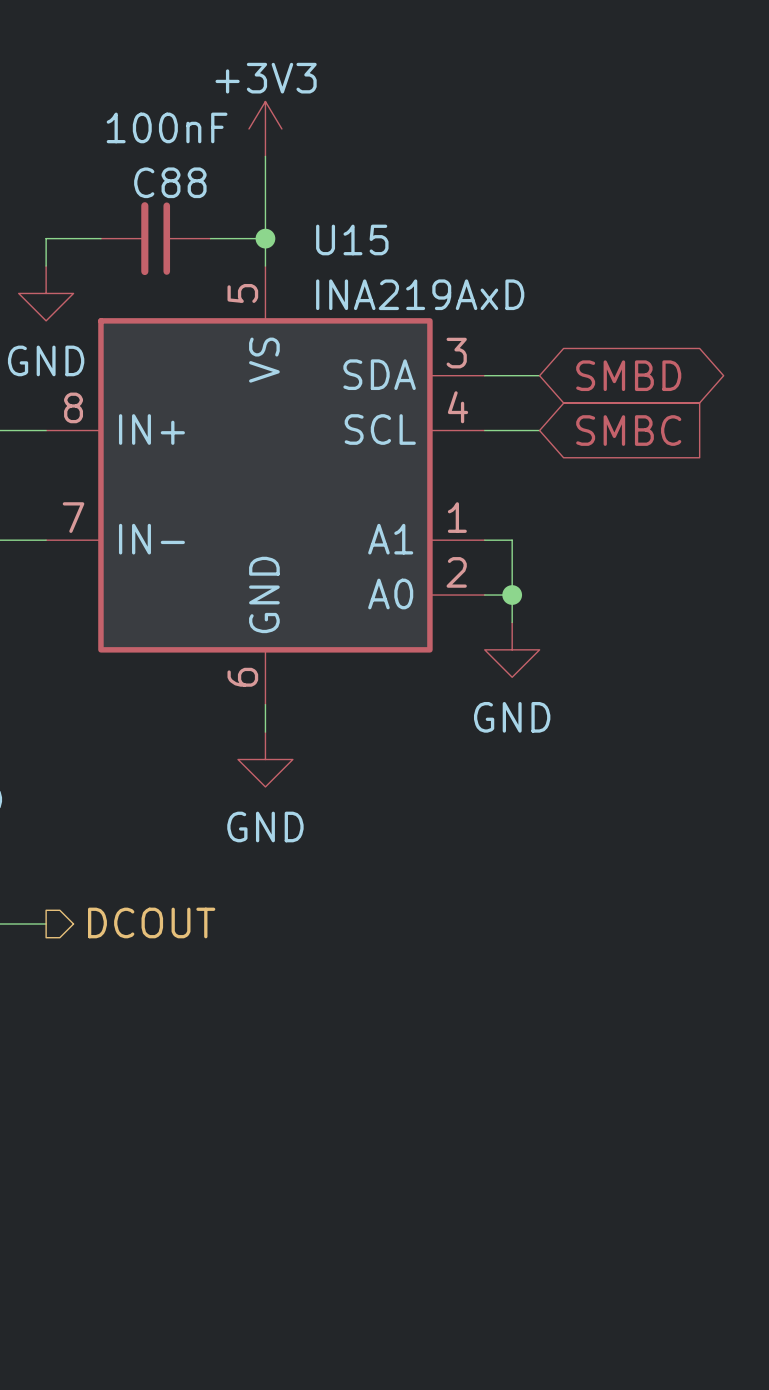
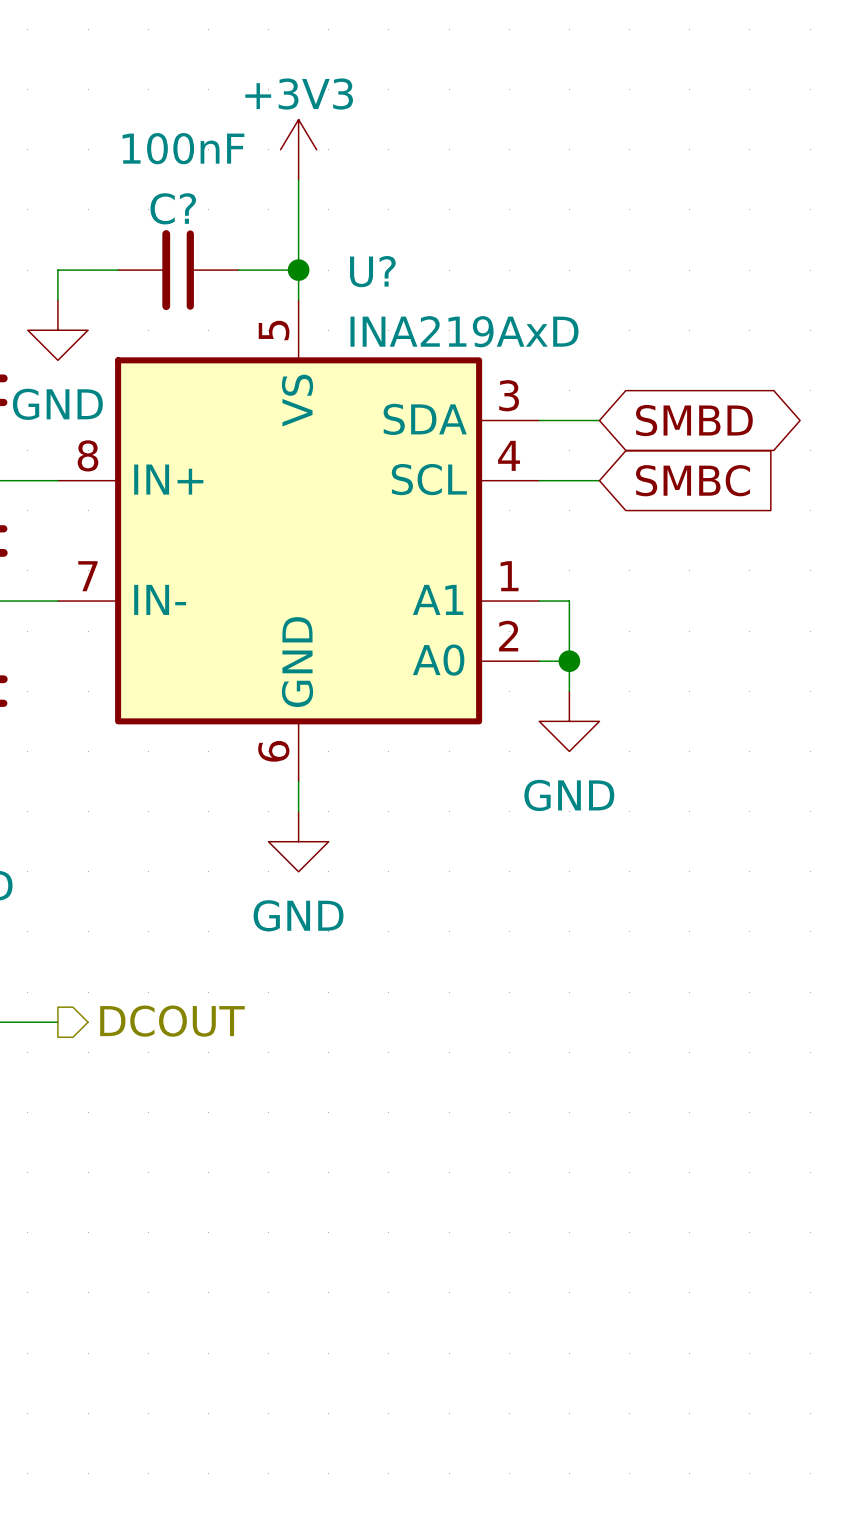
C88 name: C88 (170, 182) -> C? (173, 208)
U15 name: U15 (352, 239) -> U? (372, 271)

